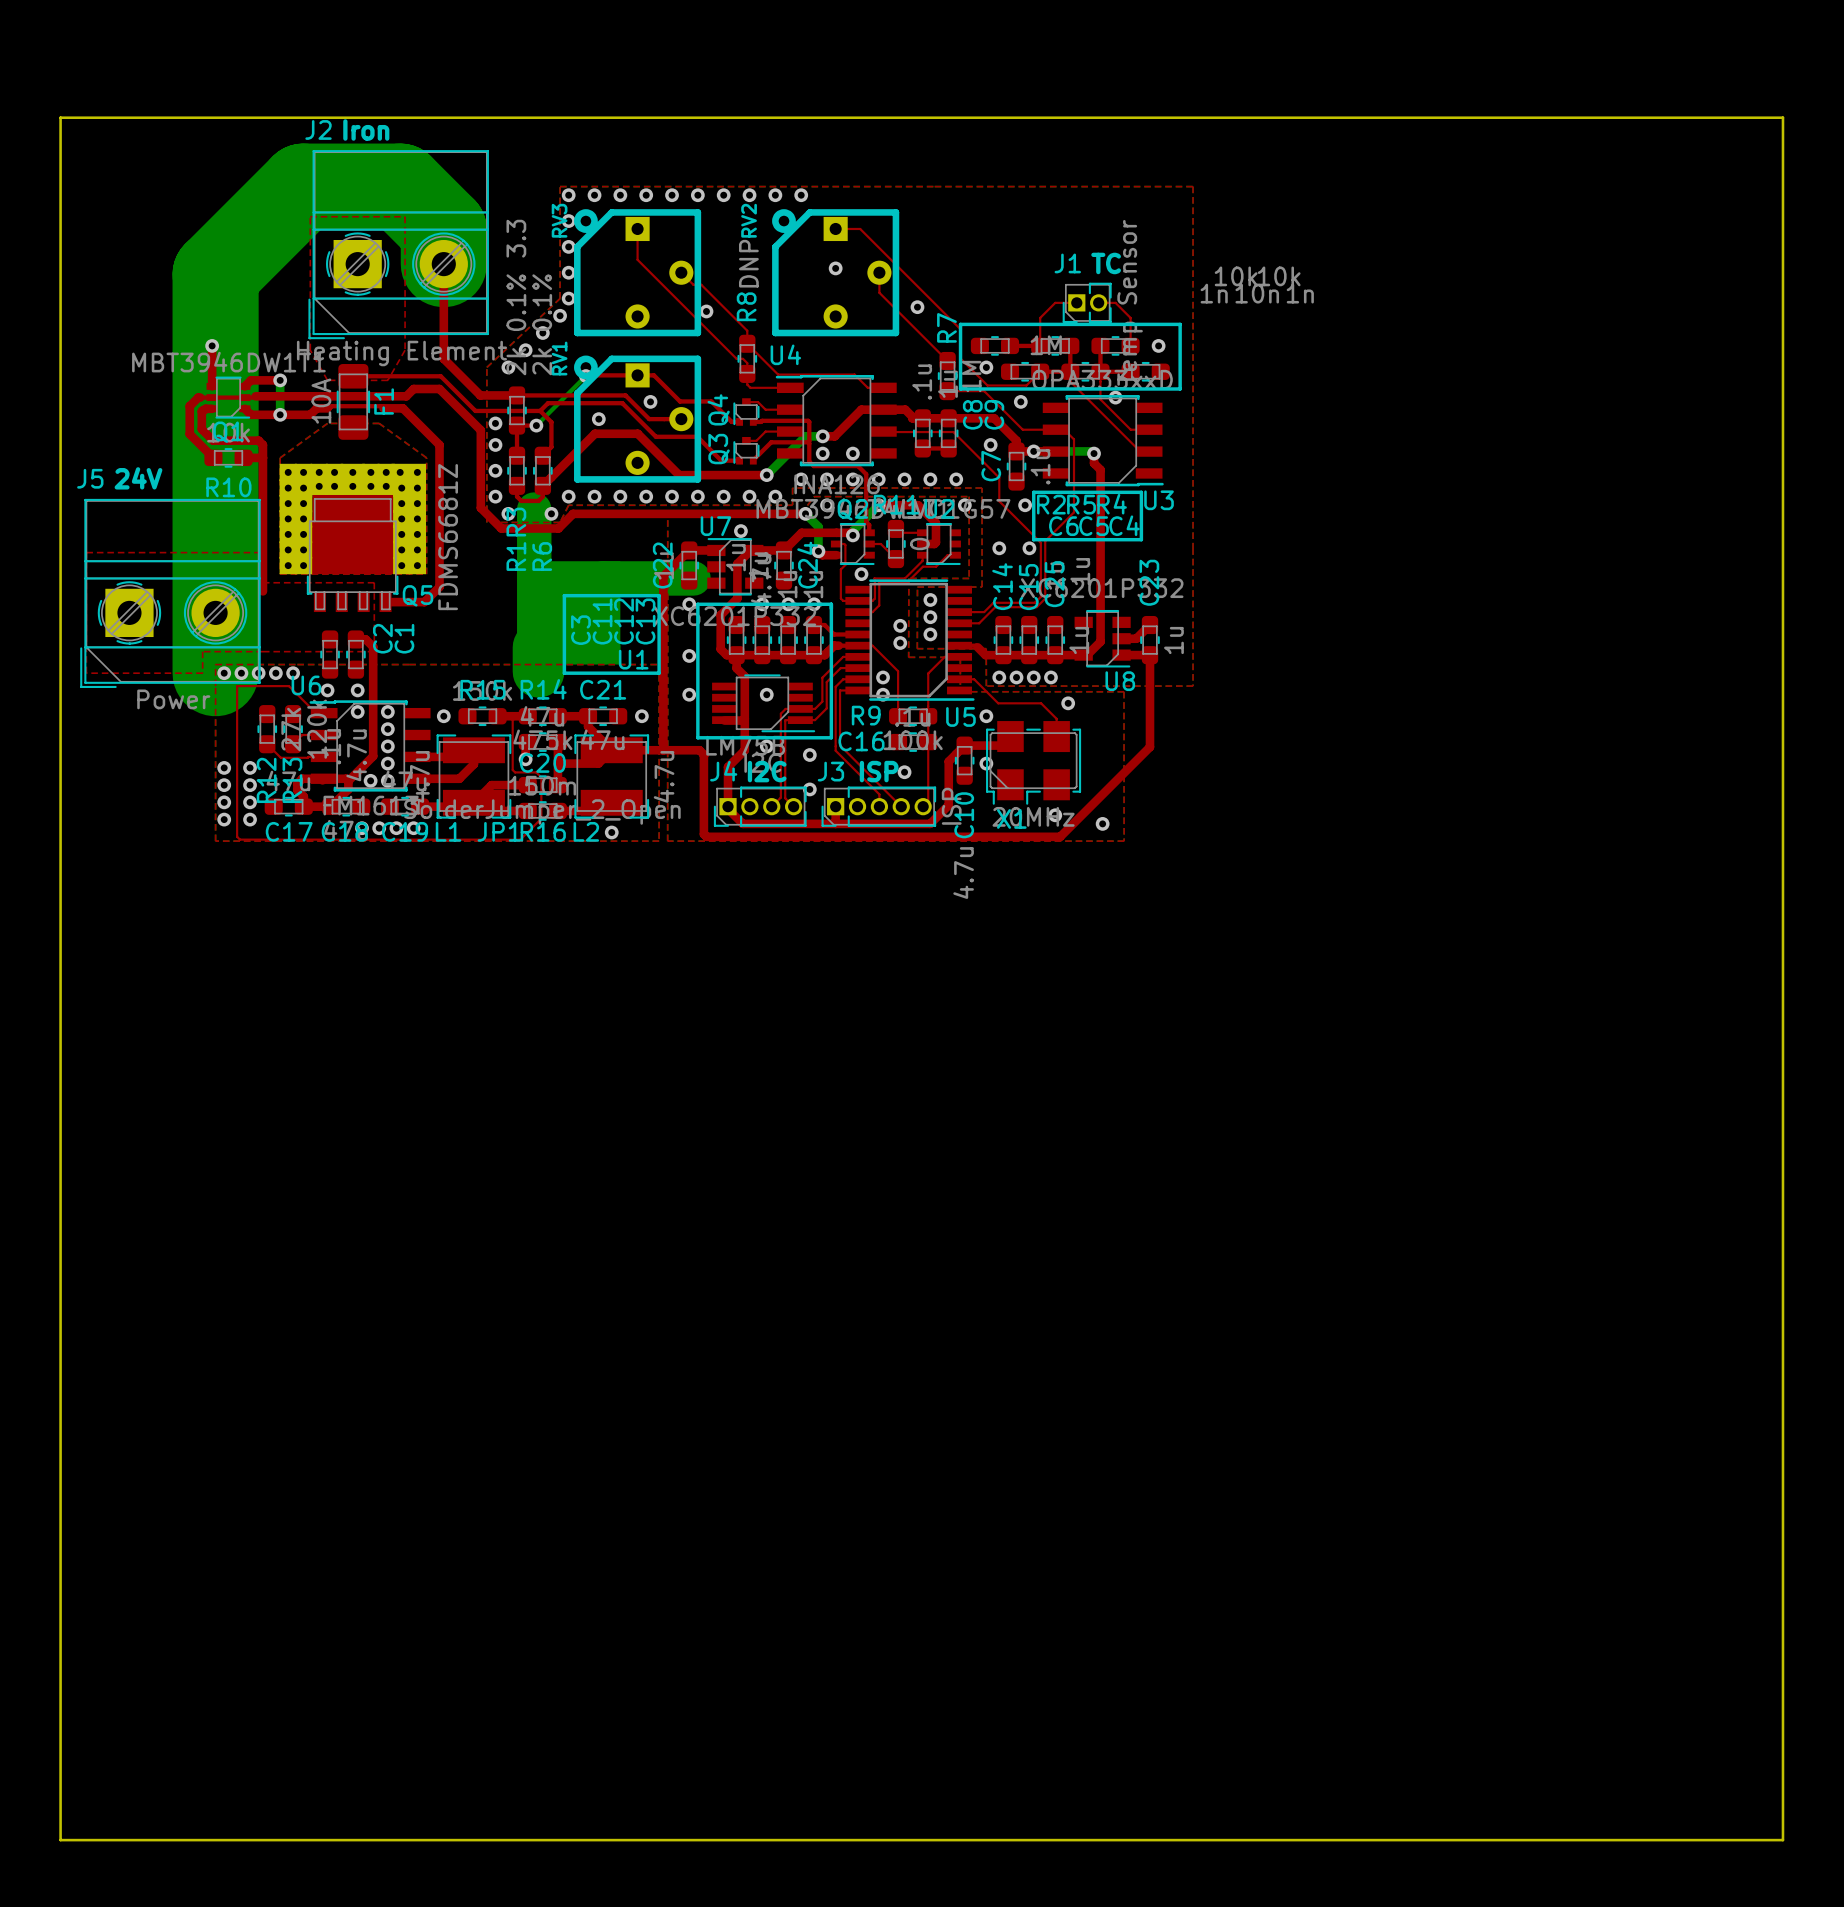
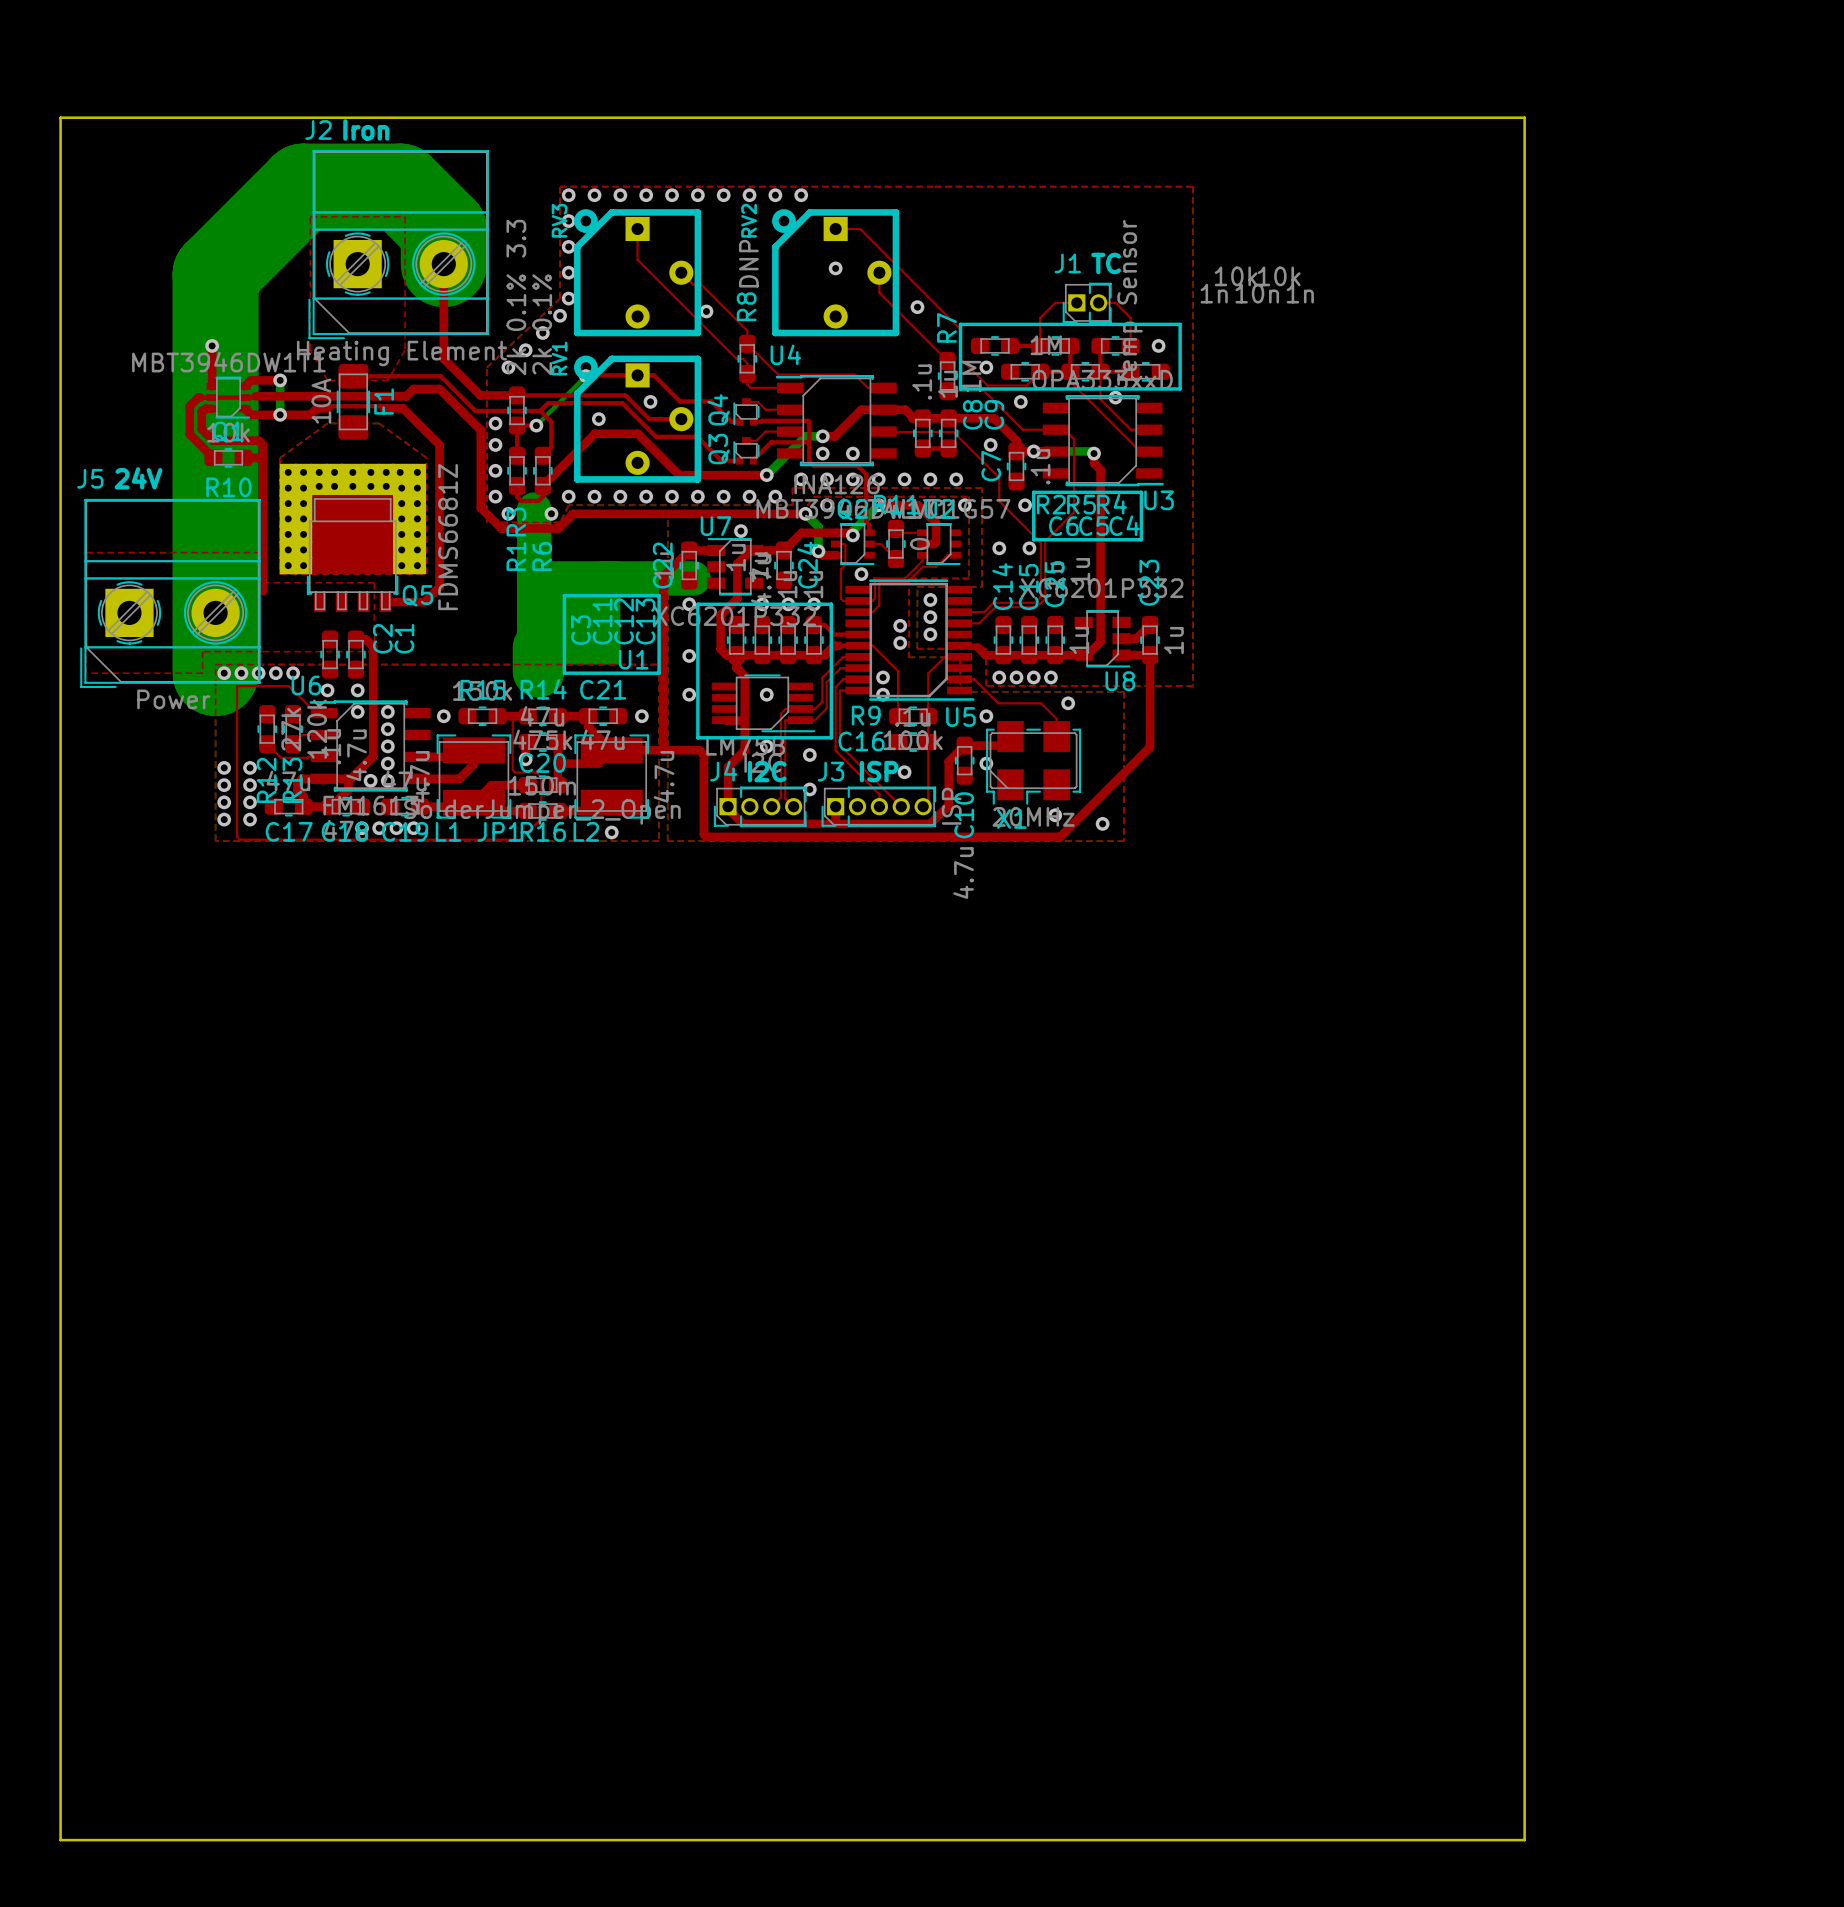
board edge: (1524, 117) (1782, 117) (1782, 1840) (1524, 1840) -> (1524, 117) (1524, 1840)

